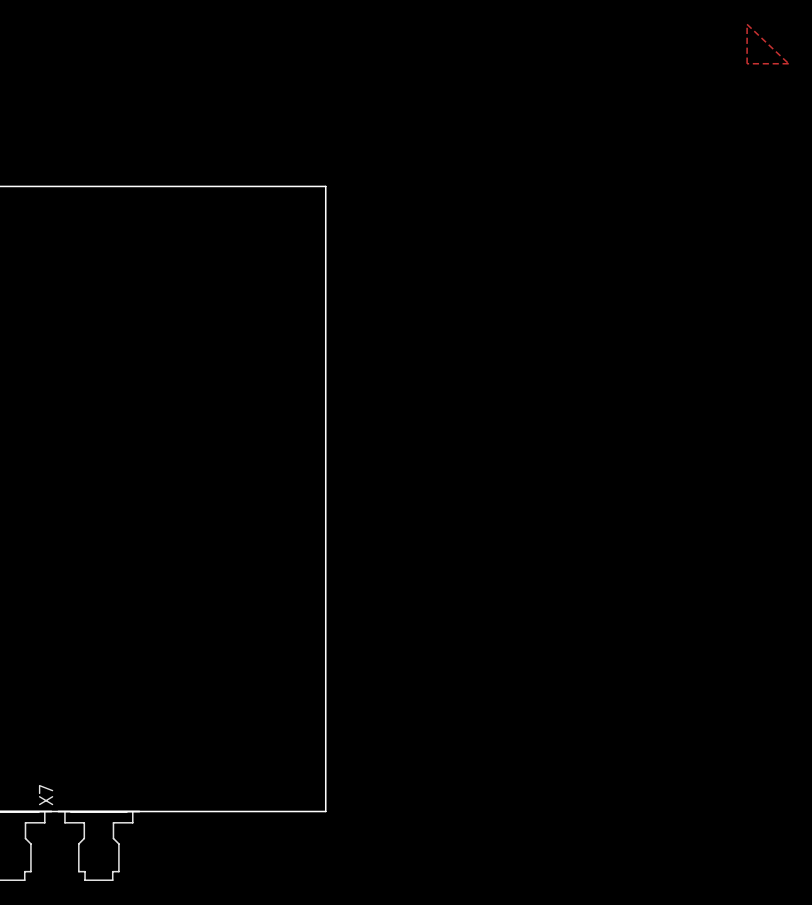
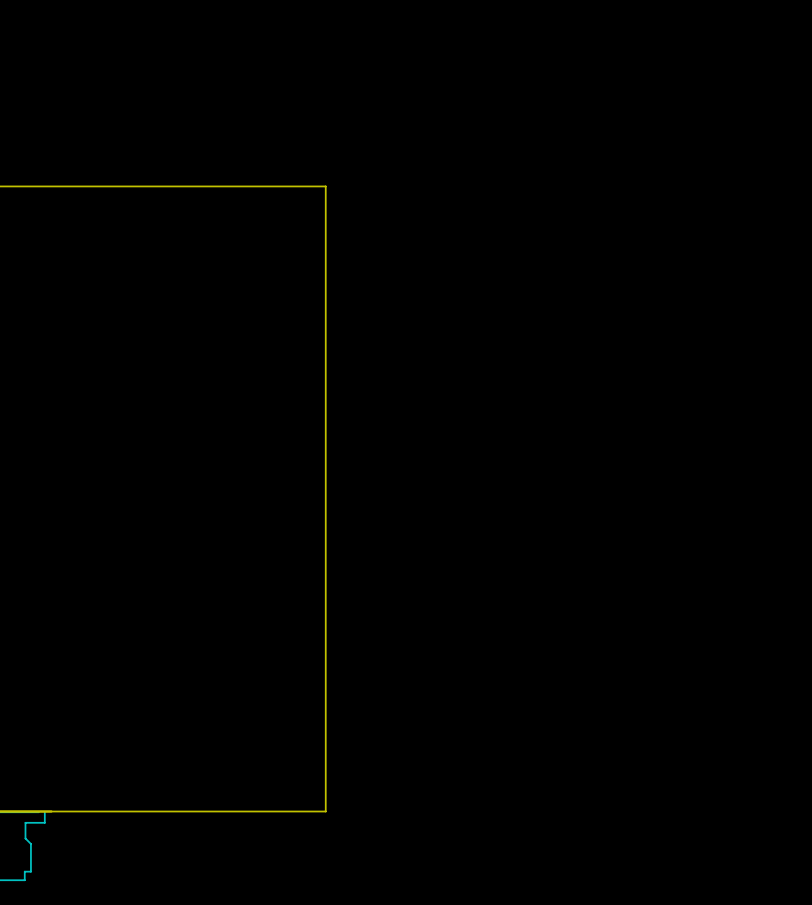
zone outline: (747, 24) (747, 63) (788, 63) (747, 24) -> none
X7: (98, 846) -> none

